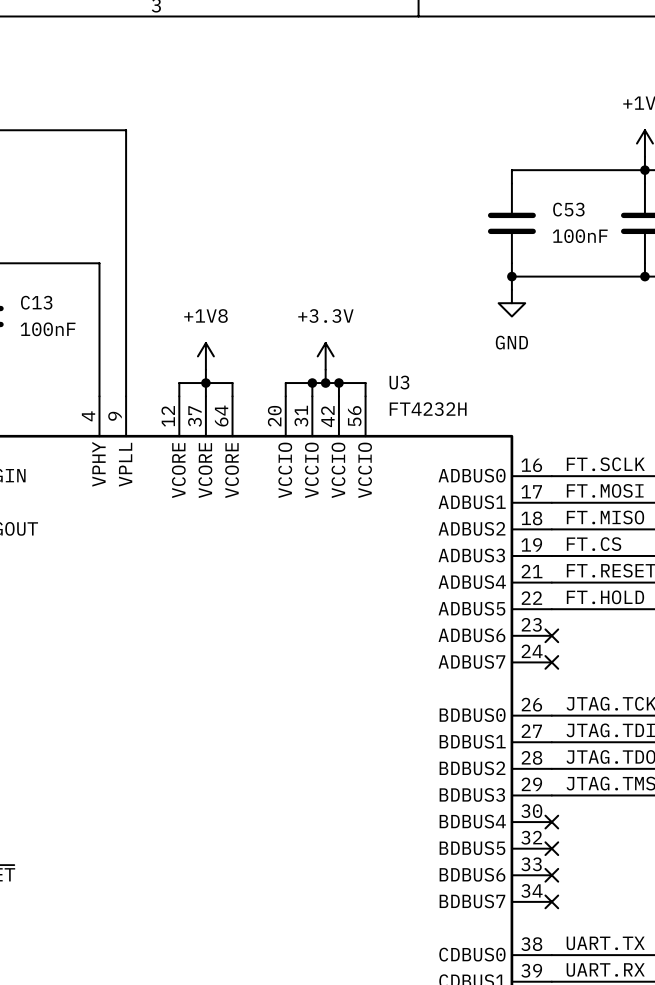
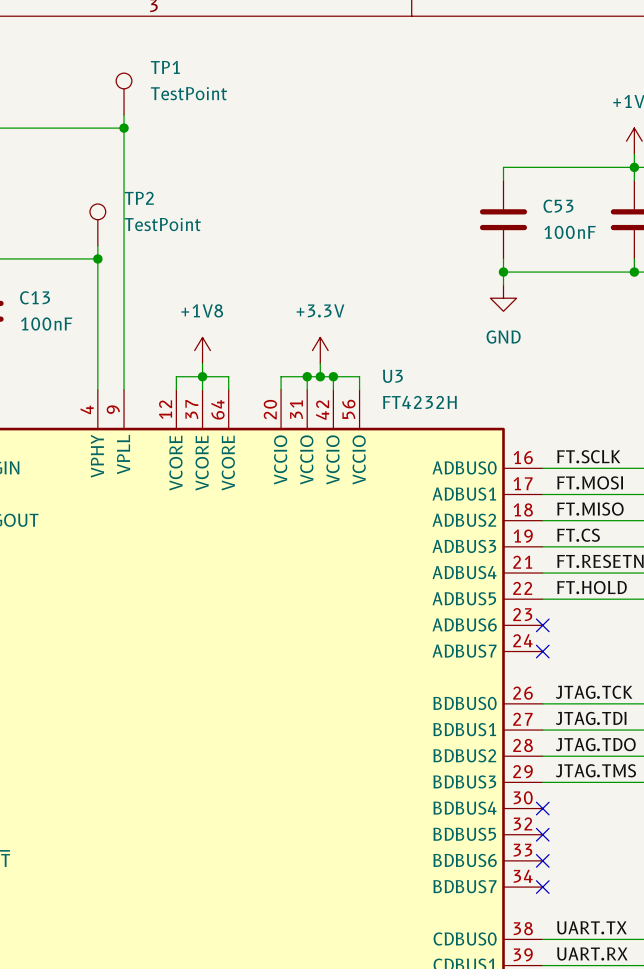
TP1: none -> TestPoint (124, 94)
wire: none -> (124, 115) (124, 128)
junction: none -> (124, 128)
TP2: none -> TestPoint (97, 224)
wire: none -> (97, 245) (97, 258)
junction: none -> (97, 258)

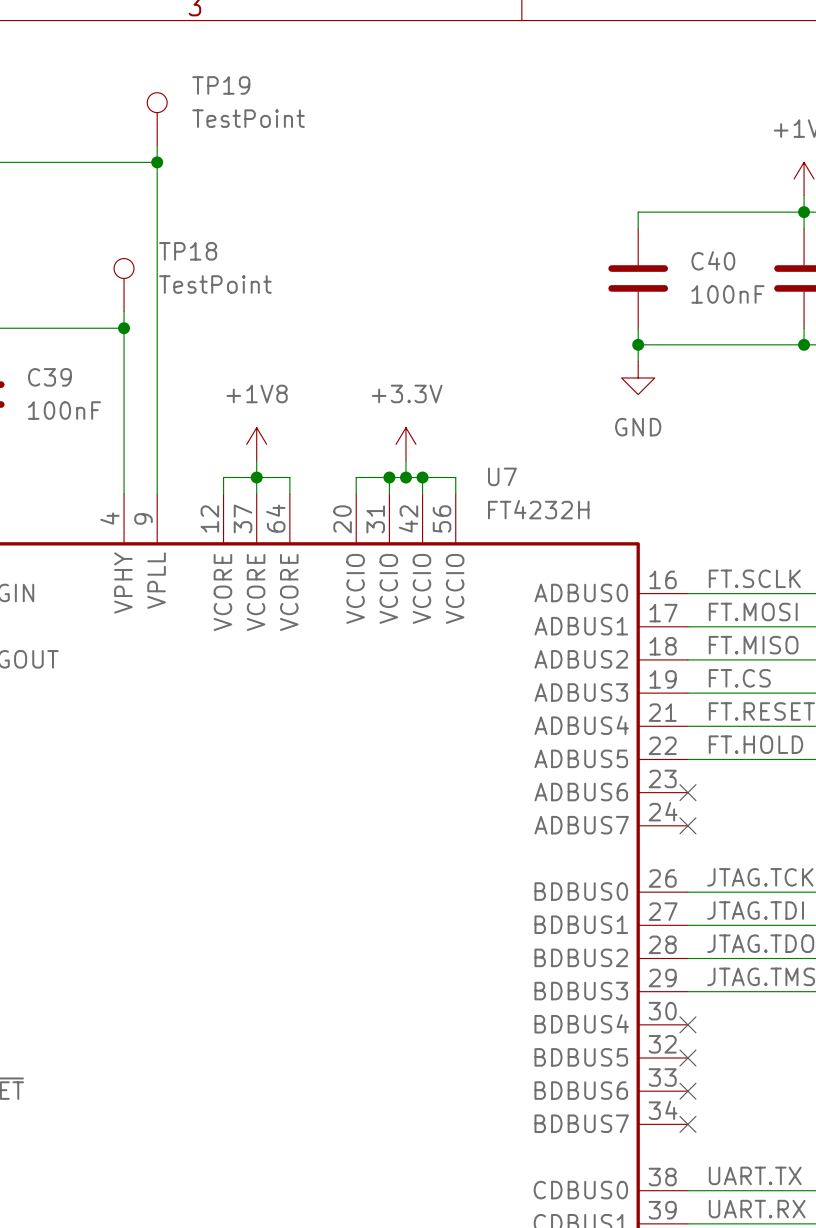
TP1 name: TP1 (165, 67) -> TP19 (221, 85)
TP2 name: TP2 (139, 198) -> TP18 (188, 251)
C53 name: C53 (558, 206) -> C40 (713, 260)
C13 name: C13 (35, 297) -> C39 (49, 377)
U3 name: U3 (392, 376) -> U7 (502, 476)

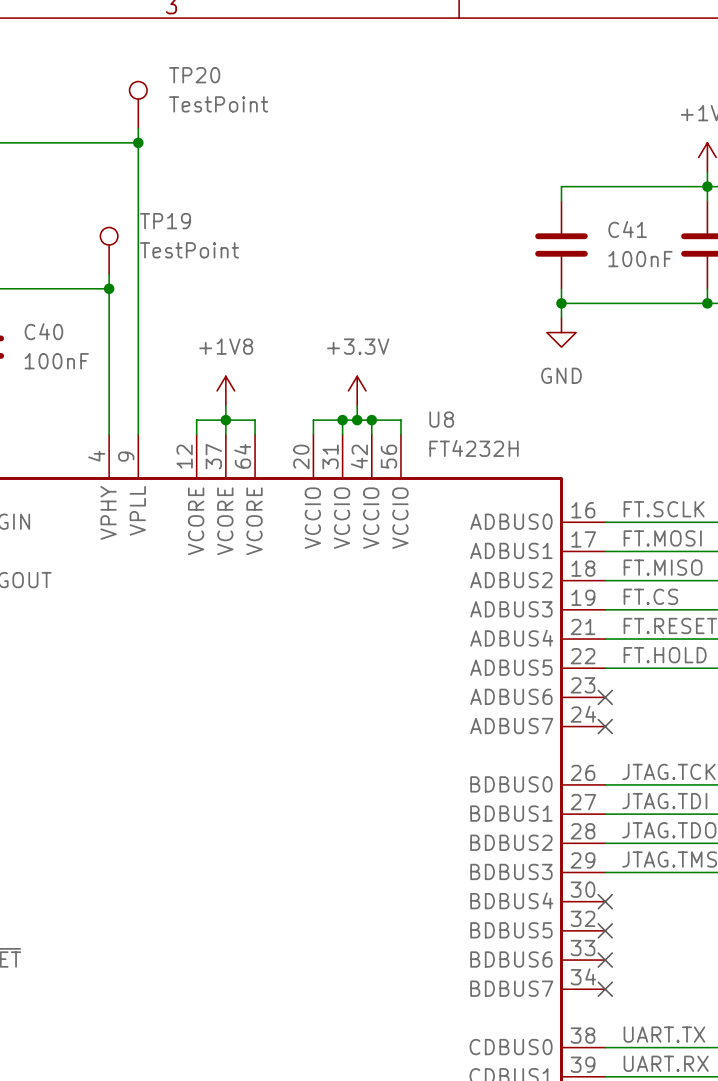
TP19 name: TP19 (221, 85) -> TP20 (194, 75)
TP18 name: TP18 (188, 251) -> TP19 (165, 221)
C40 name: C40 (713, 260) -> C41 (627, 229)
C39 name: C39 (49, 377) -> C40 (43, 331)
U7 name: U7 (502, 476) -> U8 (441, 419)

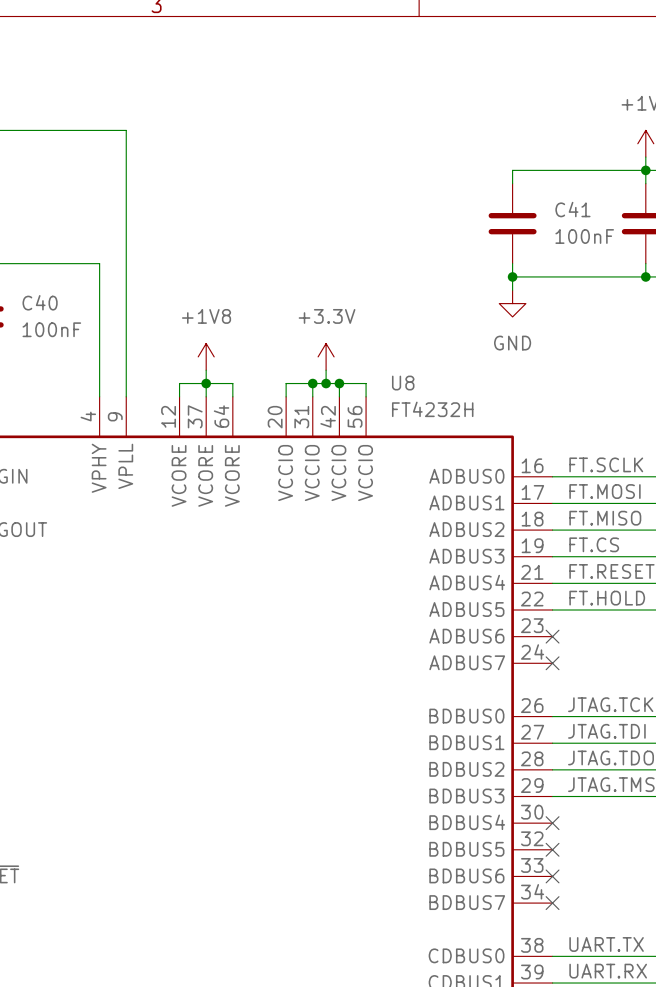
TP20: TestPoint (138, 104) -> none
wire: (138, 128) (138, 142) -> none
junction: (138, 142) -> none
TP19: TestPoint (109, 250) -> none
wire: (109, 274) (109, 288) -> none
junction: (109, 288) -> none

